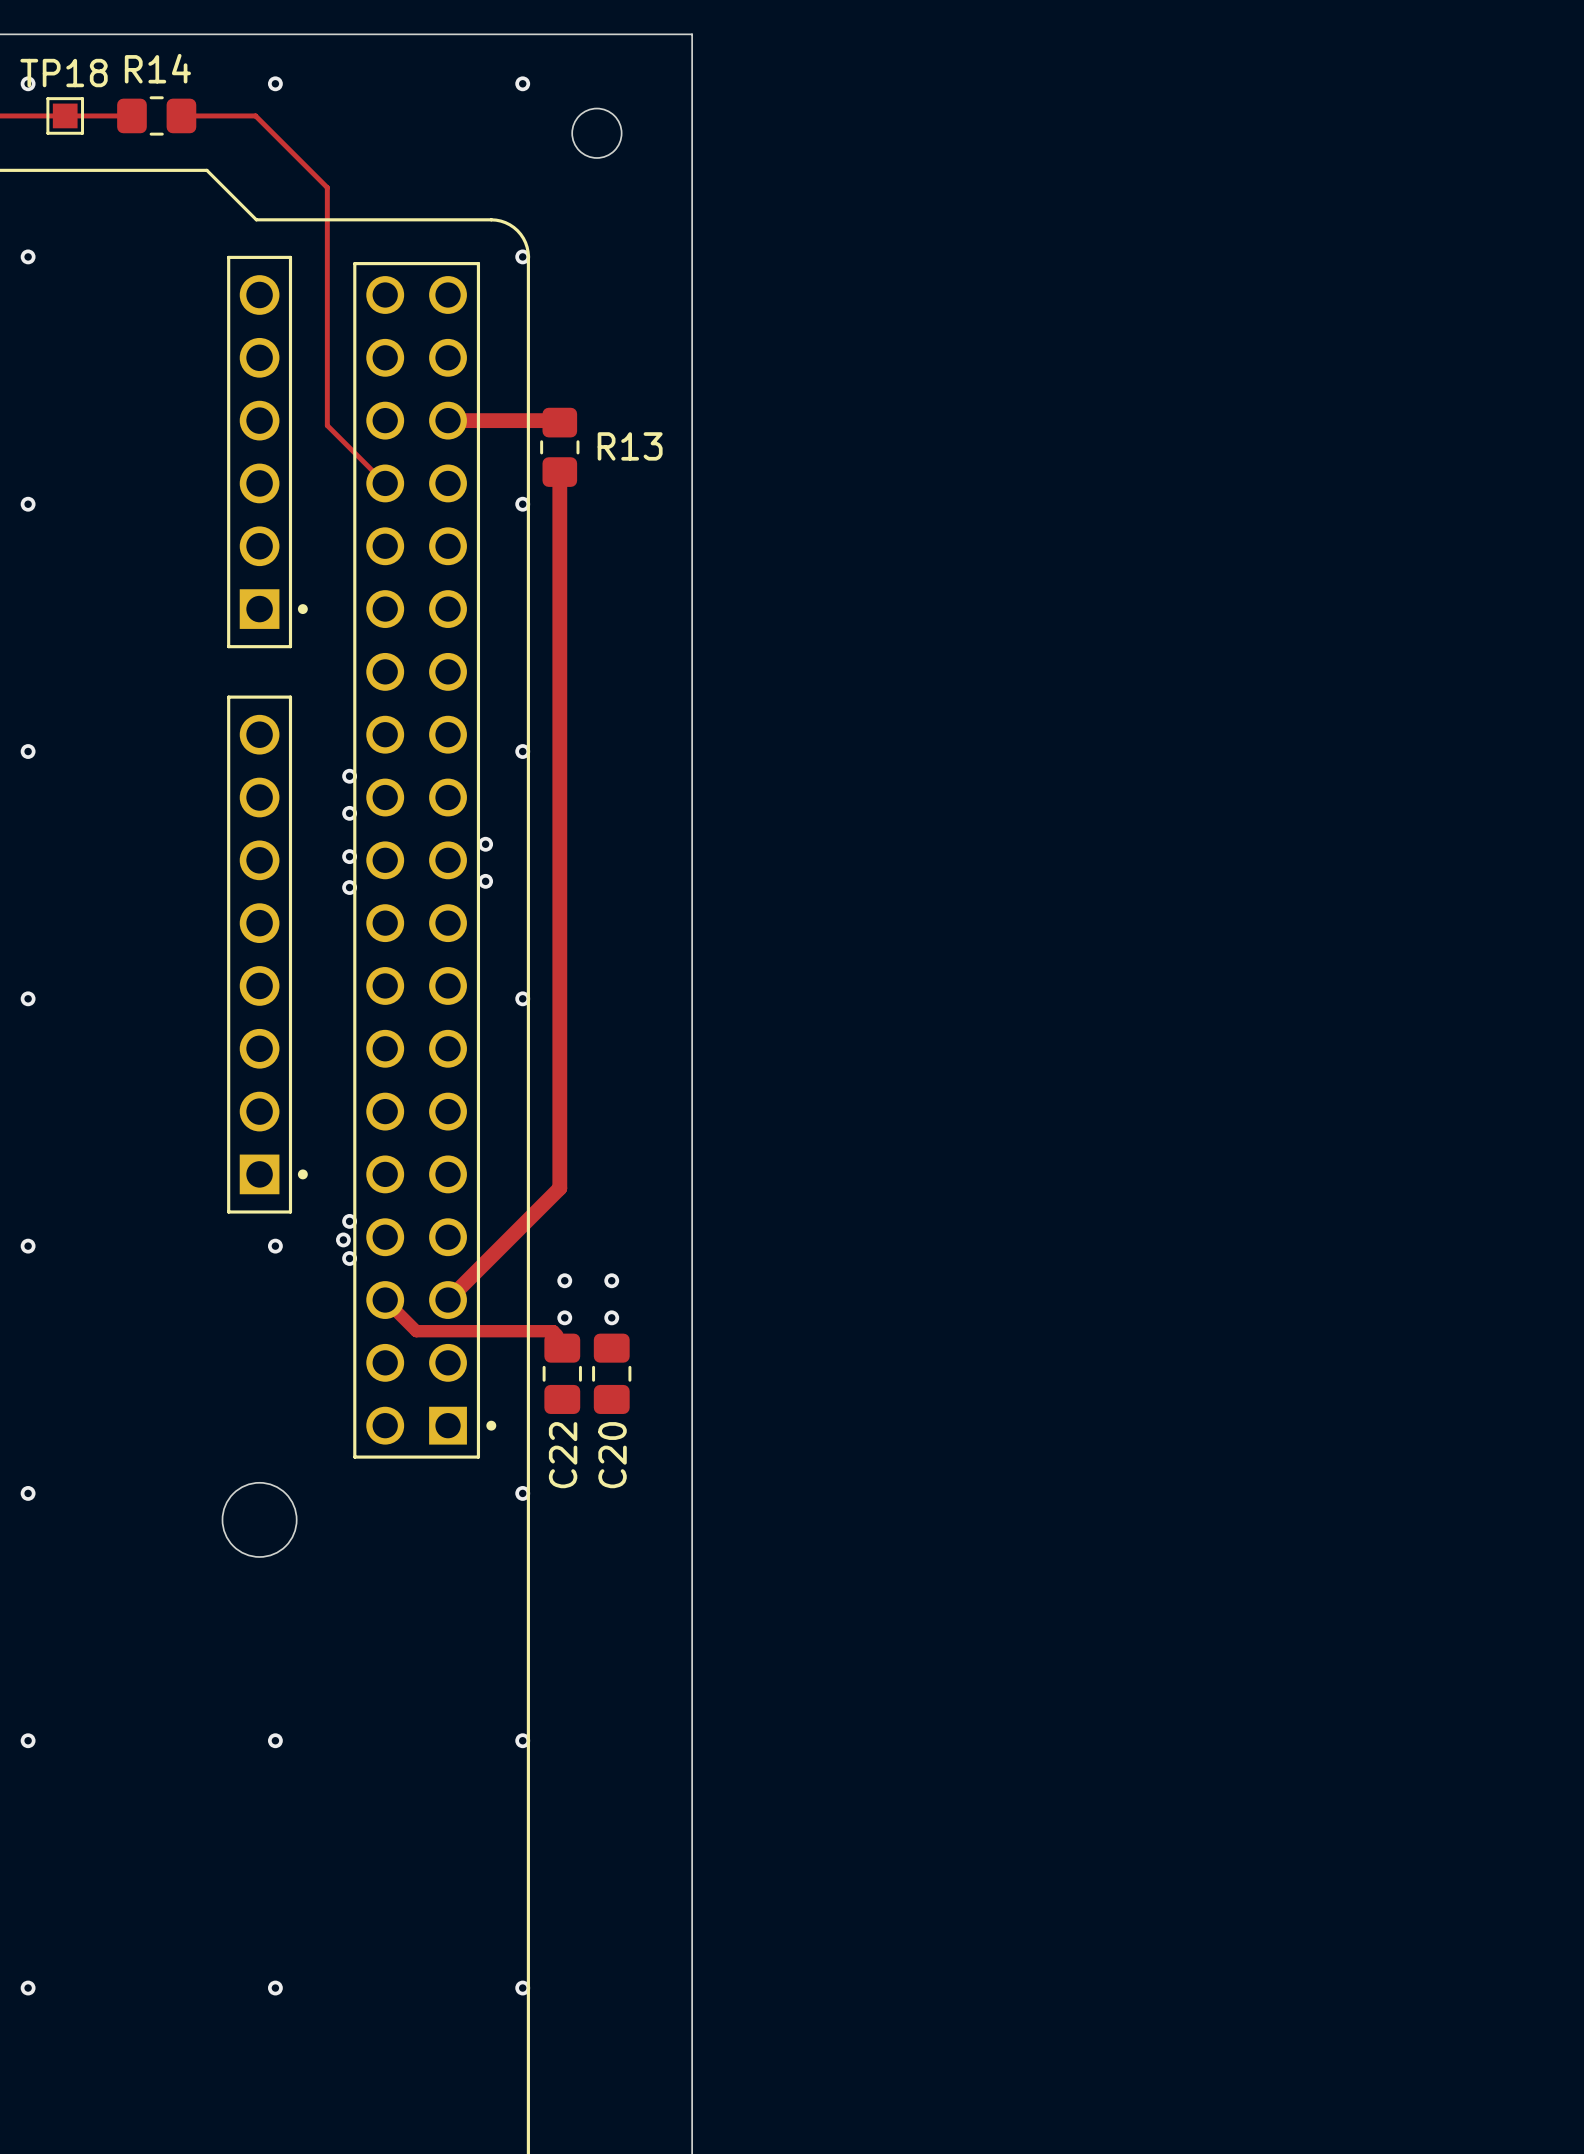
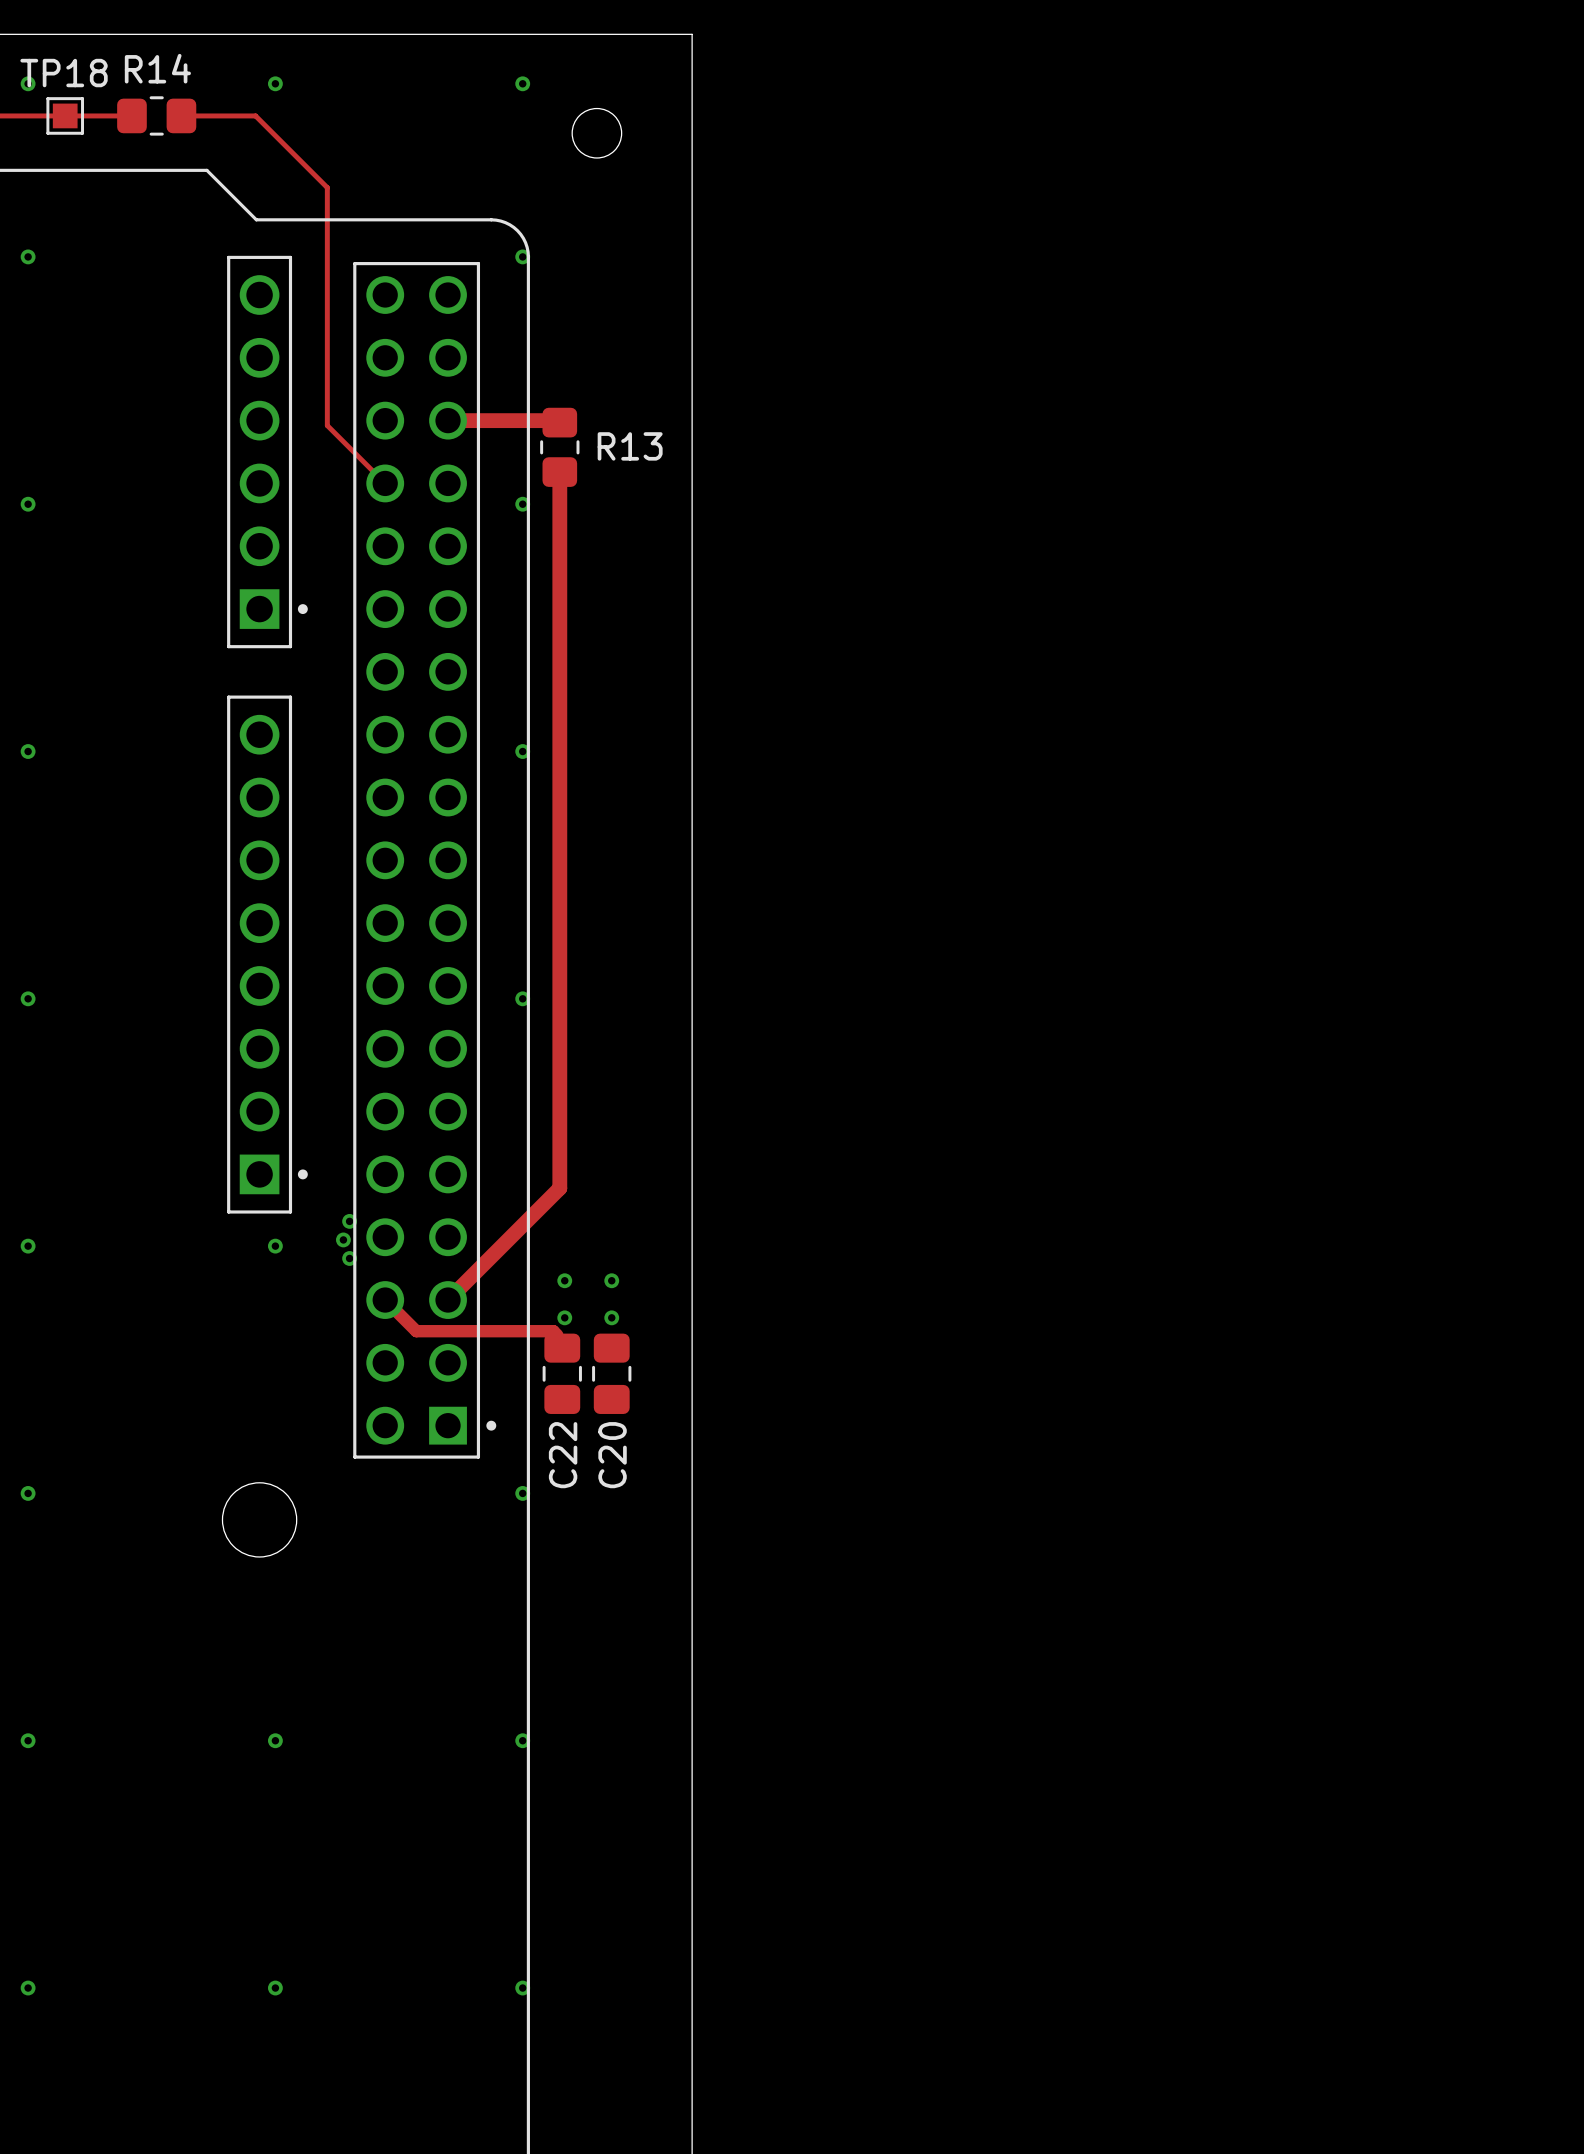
via: (349, 776) -> none
via: (349, 813) -> none
via: (485, 844) -> none
via: (349, 856) -> none
via: (485, 881) -> none
via: (349, 887) -> none

